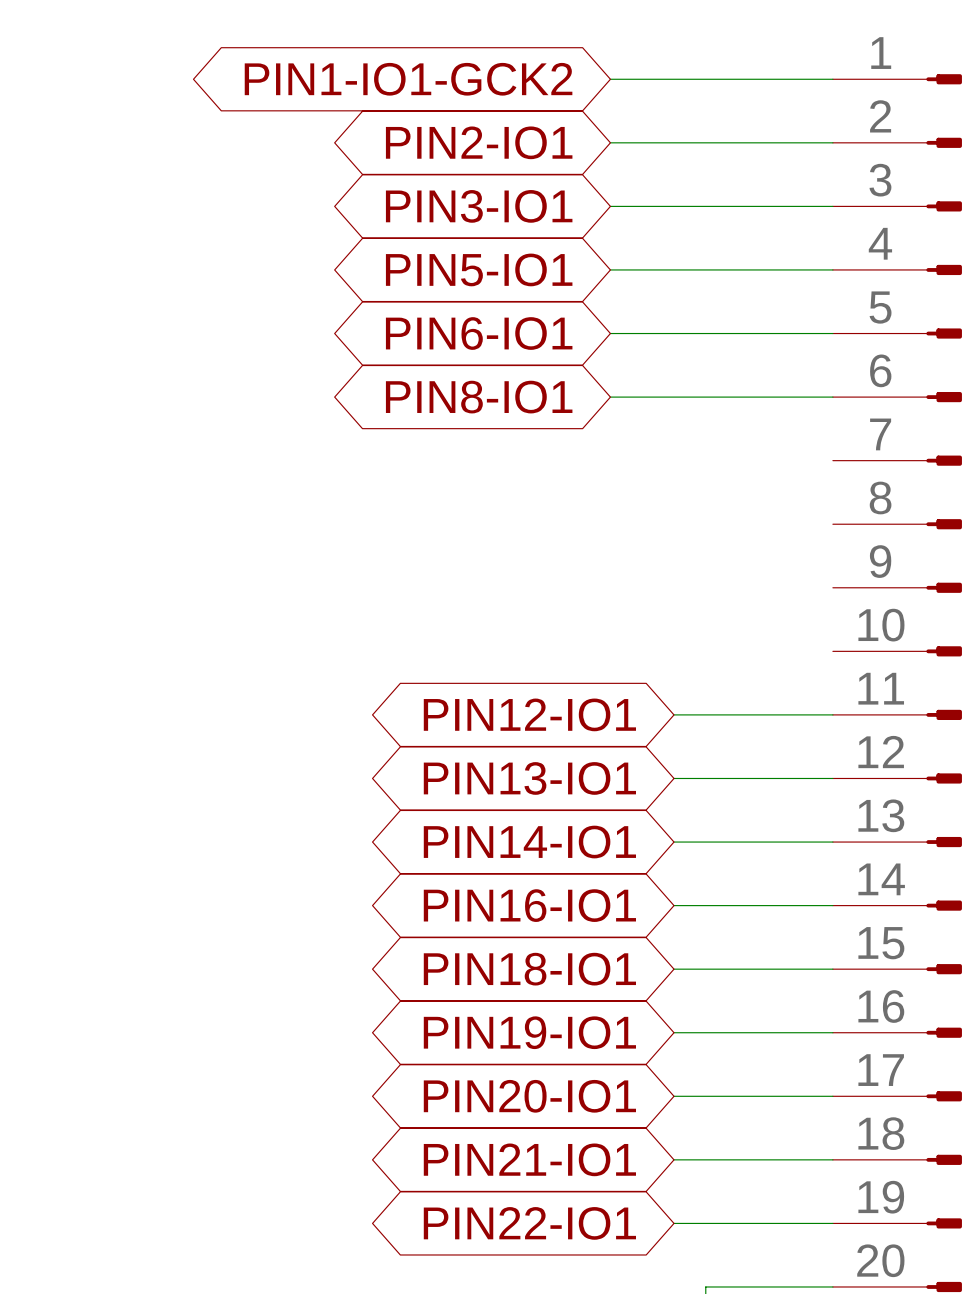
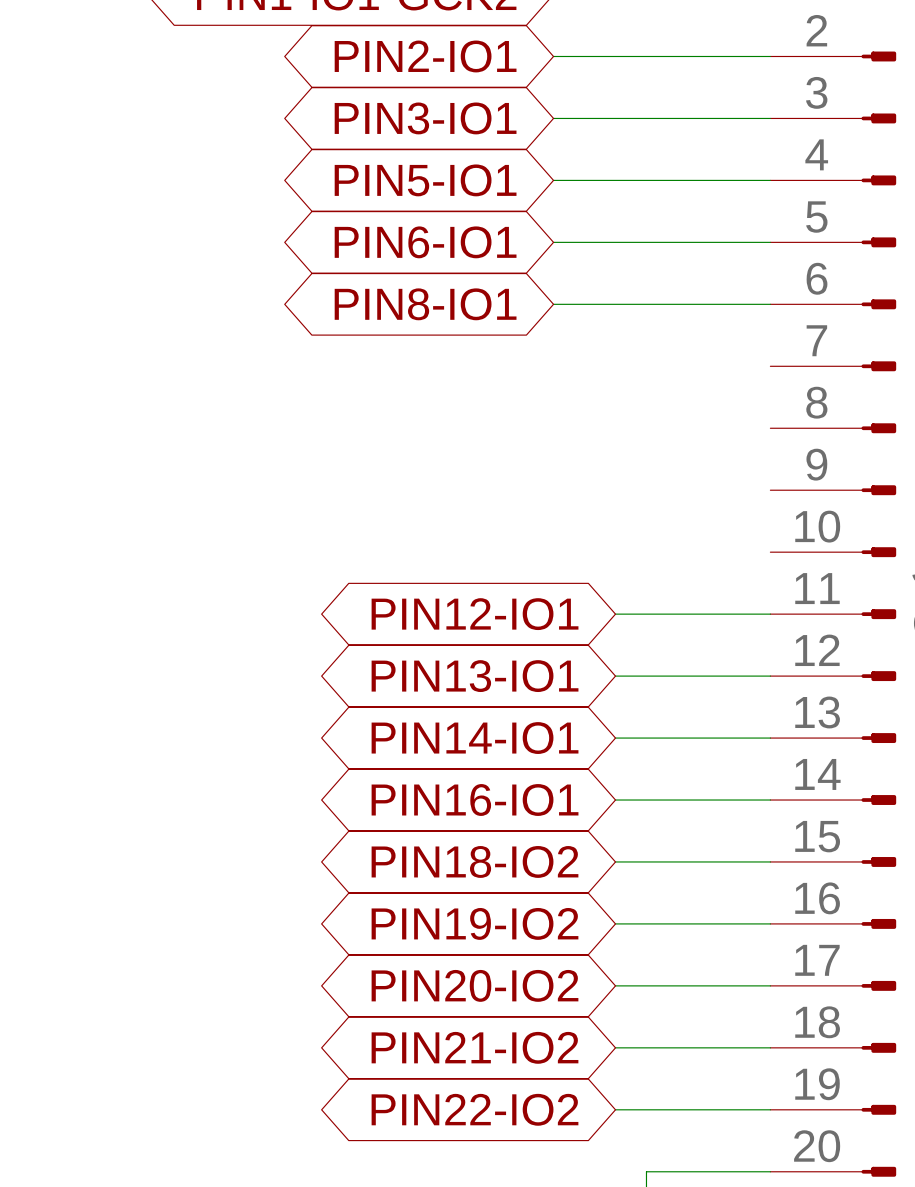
global label: PIN18-IO1 (529, 969) -> PIN18-IO2 (474, 861)
global label: PIN19-IO1 (529, 1032) -> PIN19-IO2 (474, 923)
global label: PIN20-IO1 (529, 1096) -> PIN20-IO2 (474, 985)
global label: PIN21-IO1 (529, 1159) -> PIN21-IO2 (474, 1047)
global label: PIN22-IO1 (529, 1223) -> PIN22-IO2 (474, 1109)

